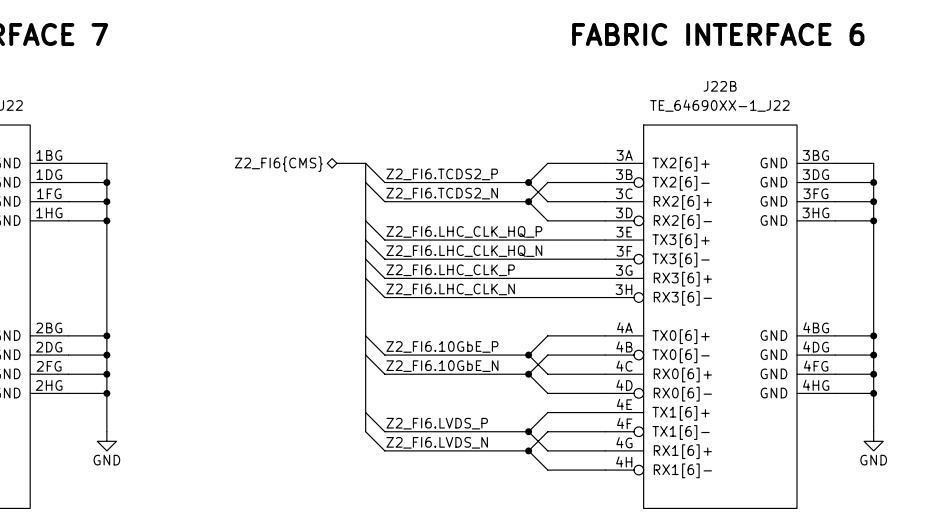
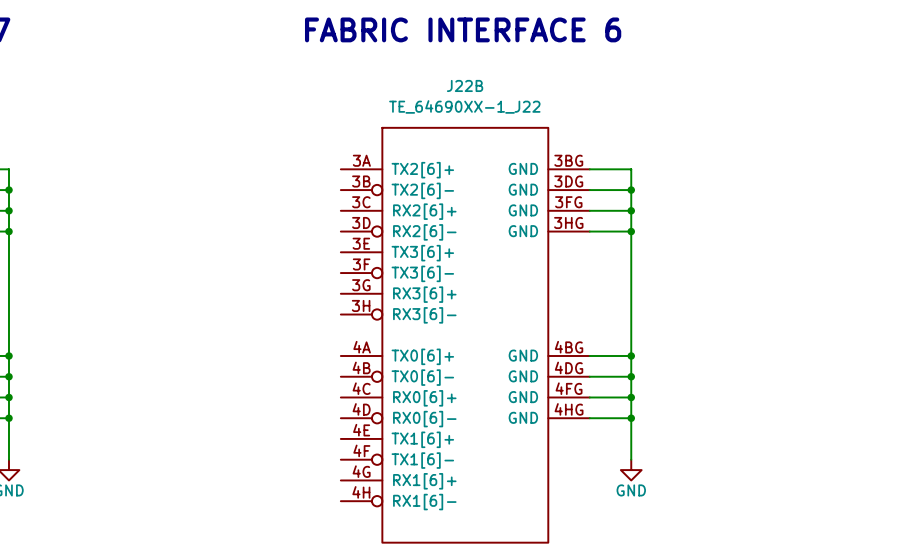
text: none -> FABRIC INTERFACE 6 (463, 29)
text: FABRIC INTERFACE 6 (718, 34) -> none
bus: (336, 163) (365, 163) (365, 431) -> none
wire: (365, 163) (384, 182) (528, 182) -> none
wire: (605, 163) (547, 163) (528, 182) -> none
wire: none -> (589, 169) (631, 169) (631, 459)
wire: (835, 163) (873, 163) (873, 431) -> none
hierarchical label: Z2_FI6{CMS} (278, 164) -> none
label: Z2_FI6.TCDS2_P (442, 174) -> none
wire: (365, 182) (384, 201) (528, 201) -> none
wire: (528, 182) (547, 201) (605, 201) -> none
junction: (528, 182) -> none
wire: (605, 182) (547, 182) (528, 201) -> none
wire: none -> (589, 190) (631, 190)
junction: none -> (631, 190)
wire: (835, 182) (873, 182) -> none
junction: (873, 182) -> none
label: Z2_FI6.TCDS2_N (442, 193) -> none
wire: (528, 201) (547, 220) (605, 220) -> none
junction: (528, 201) -> none
wire: none -> (589, 210) (631, 210)
junction: none -> (631, 210)
wire: (835, 201) (873, 201) -> none
junction: (873, 201) -> none
wire: (365, 220) (384, 240) (605, 240) -> none
wire: none -> (589, 231) (631, 231)
junction: none -> (631, 231)
wire: (835, 220) (873, 220) -> none
junction: (873, 220) -> none
label: Z2_FI6.LHC_CLK_HQ_P (464, 231) -> none
wire: (365, 240) (384, 259) (605, 259) -> none
label: Z2_FI6.LHC_CLK_HQ_N (464, 251) -> none
wire: (365, 259) (384, 278) (605, 278) -> none
label: Z2_FI6.LHC_CLK_P (450, 270) -> none
wire: (365, 278) (384, 297) (605, 297) -> none
label: Z2_FI6.LHC_CLK_N (450, 289) -> none
J22B position: (720, 316) -> (465, 335)
wire: (365, 335) (384, 355) (528, 355) -> none
wire: (605, 335) (547, 335) (528, 355) -> none
wire: none -> (589, 356) (631, 356)
junction: none -> (631, 356)
wire: (835, 335) (873, 335) -> none
junction: (873, 335) -> none
label: Z2_FI6.10GbE_P (442, 346) -> none
wire: (365, 355) (384, 374) (528, 374) -> none
wire: (528, 355) (547, 374) (605, 374) -> none
junction: (528, 355) -> none
wire: (605, 355) (547, 355) (528, 374) -> none
wire: none -> (589, 376) (631, 376)
junction: none -> (631, 376)
wire: (835, 355) (873, 355) -> none
junction: (873, 355) -> none
label: Z2_FI6.10GbE_N (442, 366) -> none
wire: (528, 374) (547, 393) (605, 393) -> none
junction: (528, 374) -> none
wire: none -> (589, 397) (631, 397)
junction: none -> (631, 397)
wire: (835, 374) (873, 374) -> none
junction: (873, 374) -> none
wire: none -> (589, 418) (631, 418)
junction: none -> (631, 418)
wire: (835, 393) (873, 393) -> none
junction: (873, 393) -> none
wire: (365, 412) (384, 431) (528, 431) -> none
wire: (605, 412) (547, 412) (528, 431) -> none
label: Z2_FI6.LVDS_P (437, 423) -> none
wire: (365, 431) (384, 450) (528, 450) -> none
wire: (528, 431) (547, 450) (605, 450) -> none
junction: (528, 431) -> none
wire: (605, 431) (547, 431) (528, 450) -> none
power symbol: none -> GND (631, 470)
power symbol: GND (873, 441) -> none
label: Z2_FI6.LVDS_N (437, 442) -> none
wire: (528, 450) (547, 470) (605, 470) -> none
junction: (528, 450) -> none

